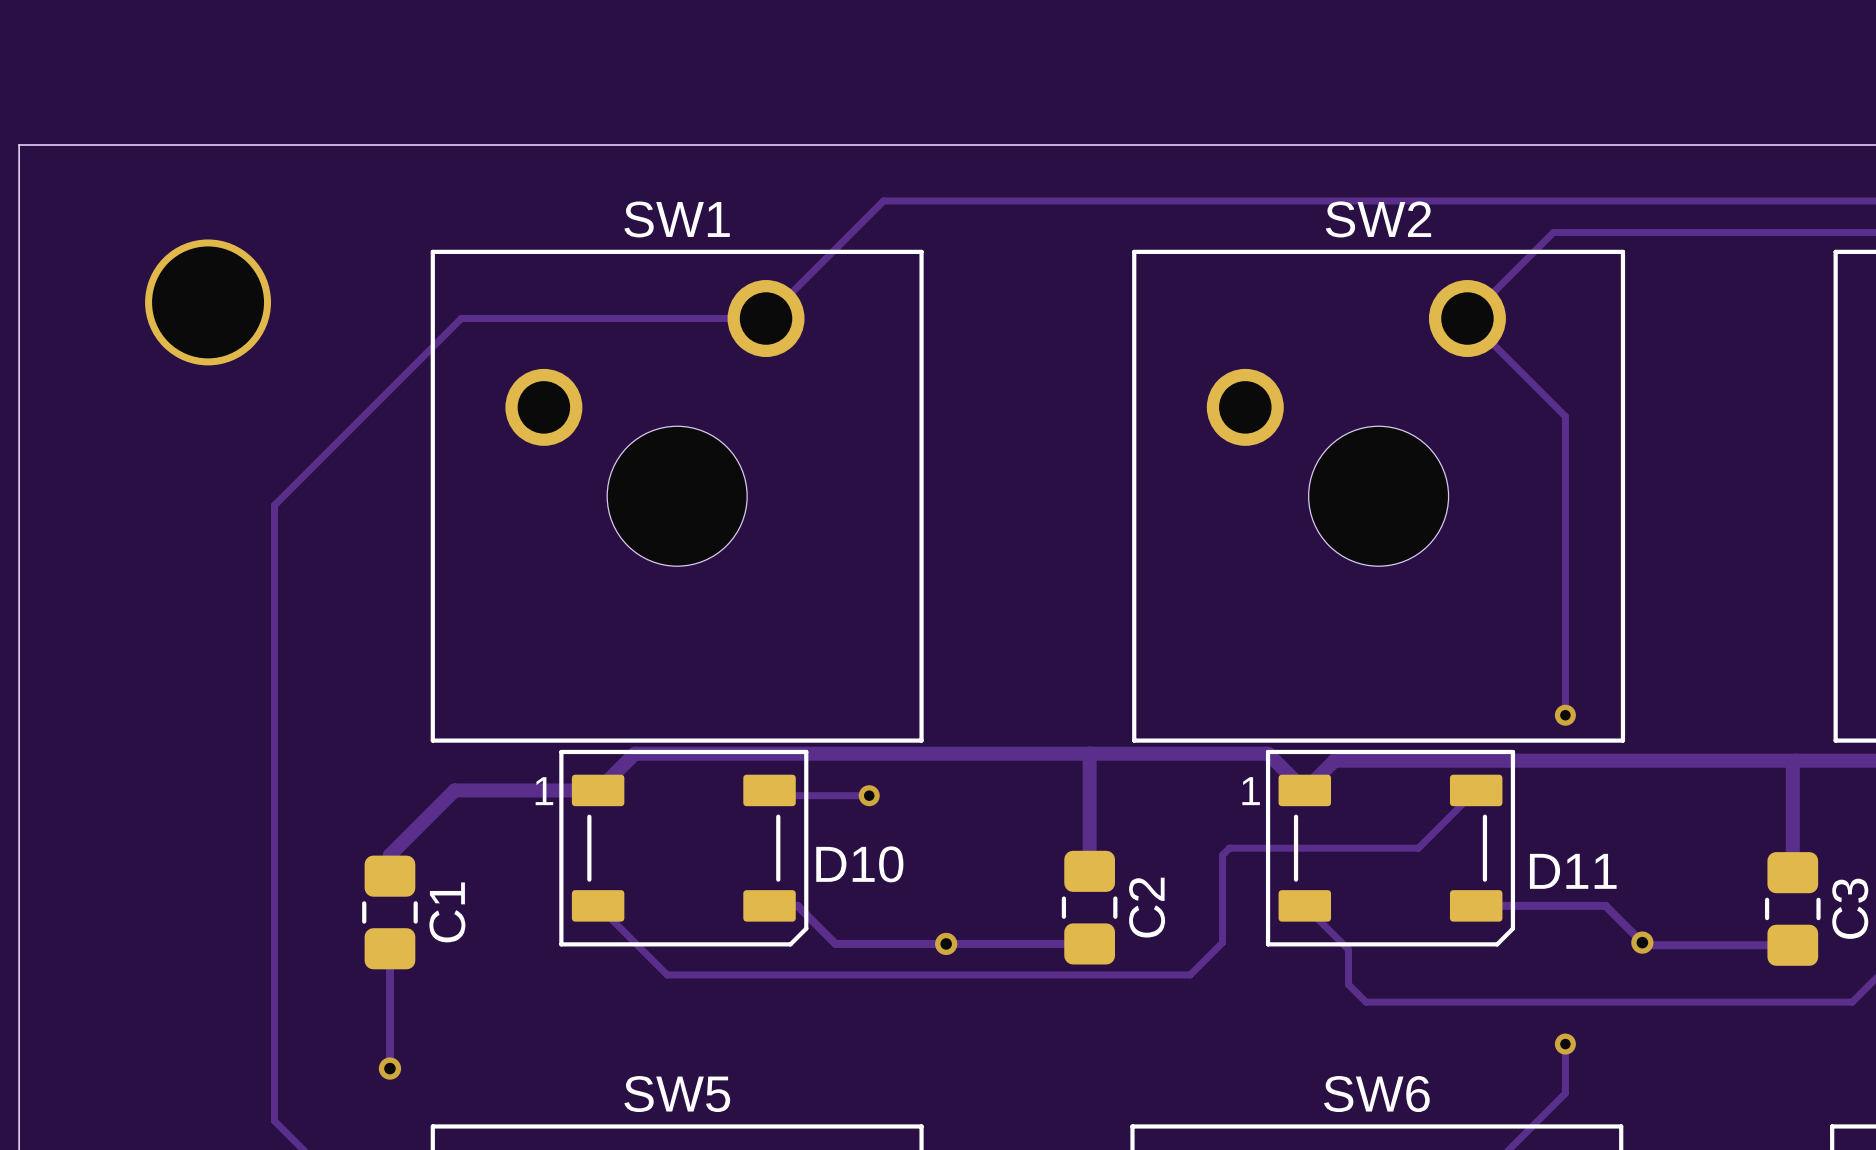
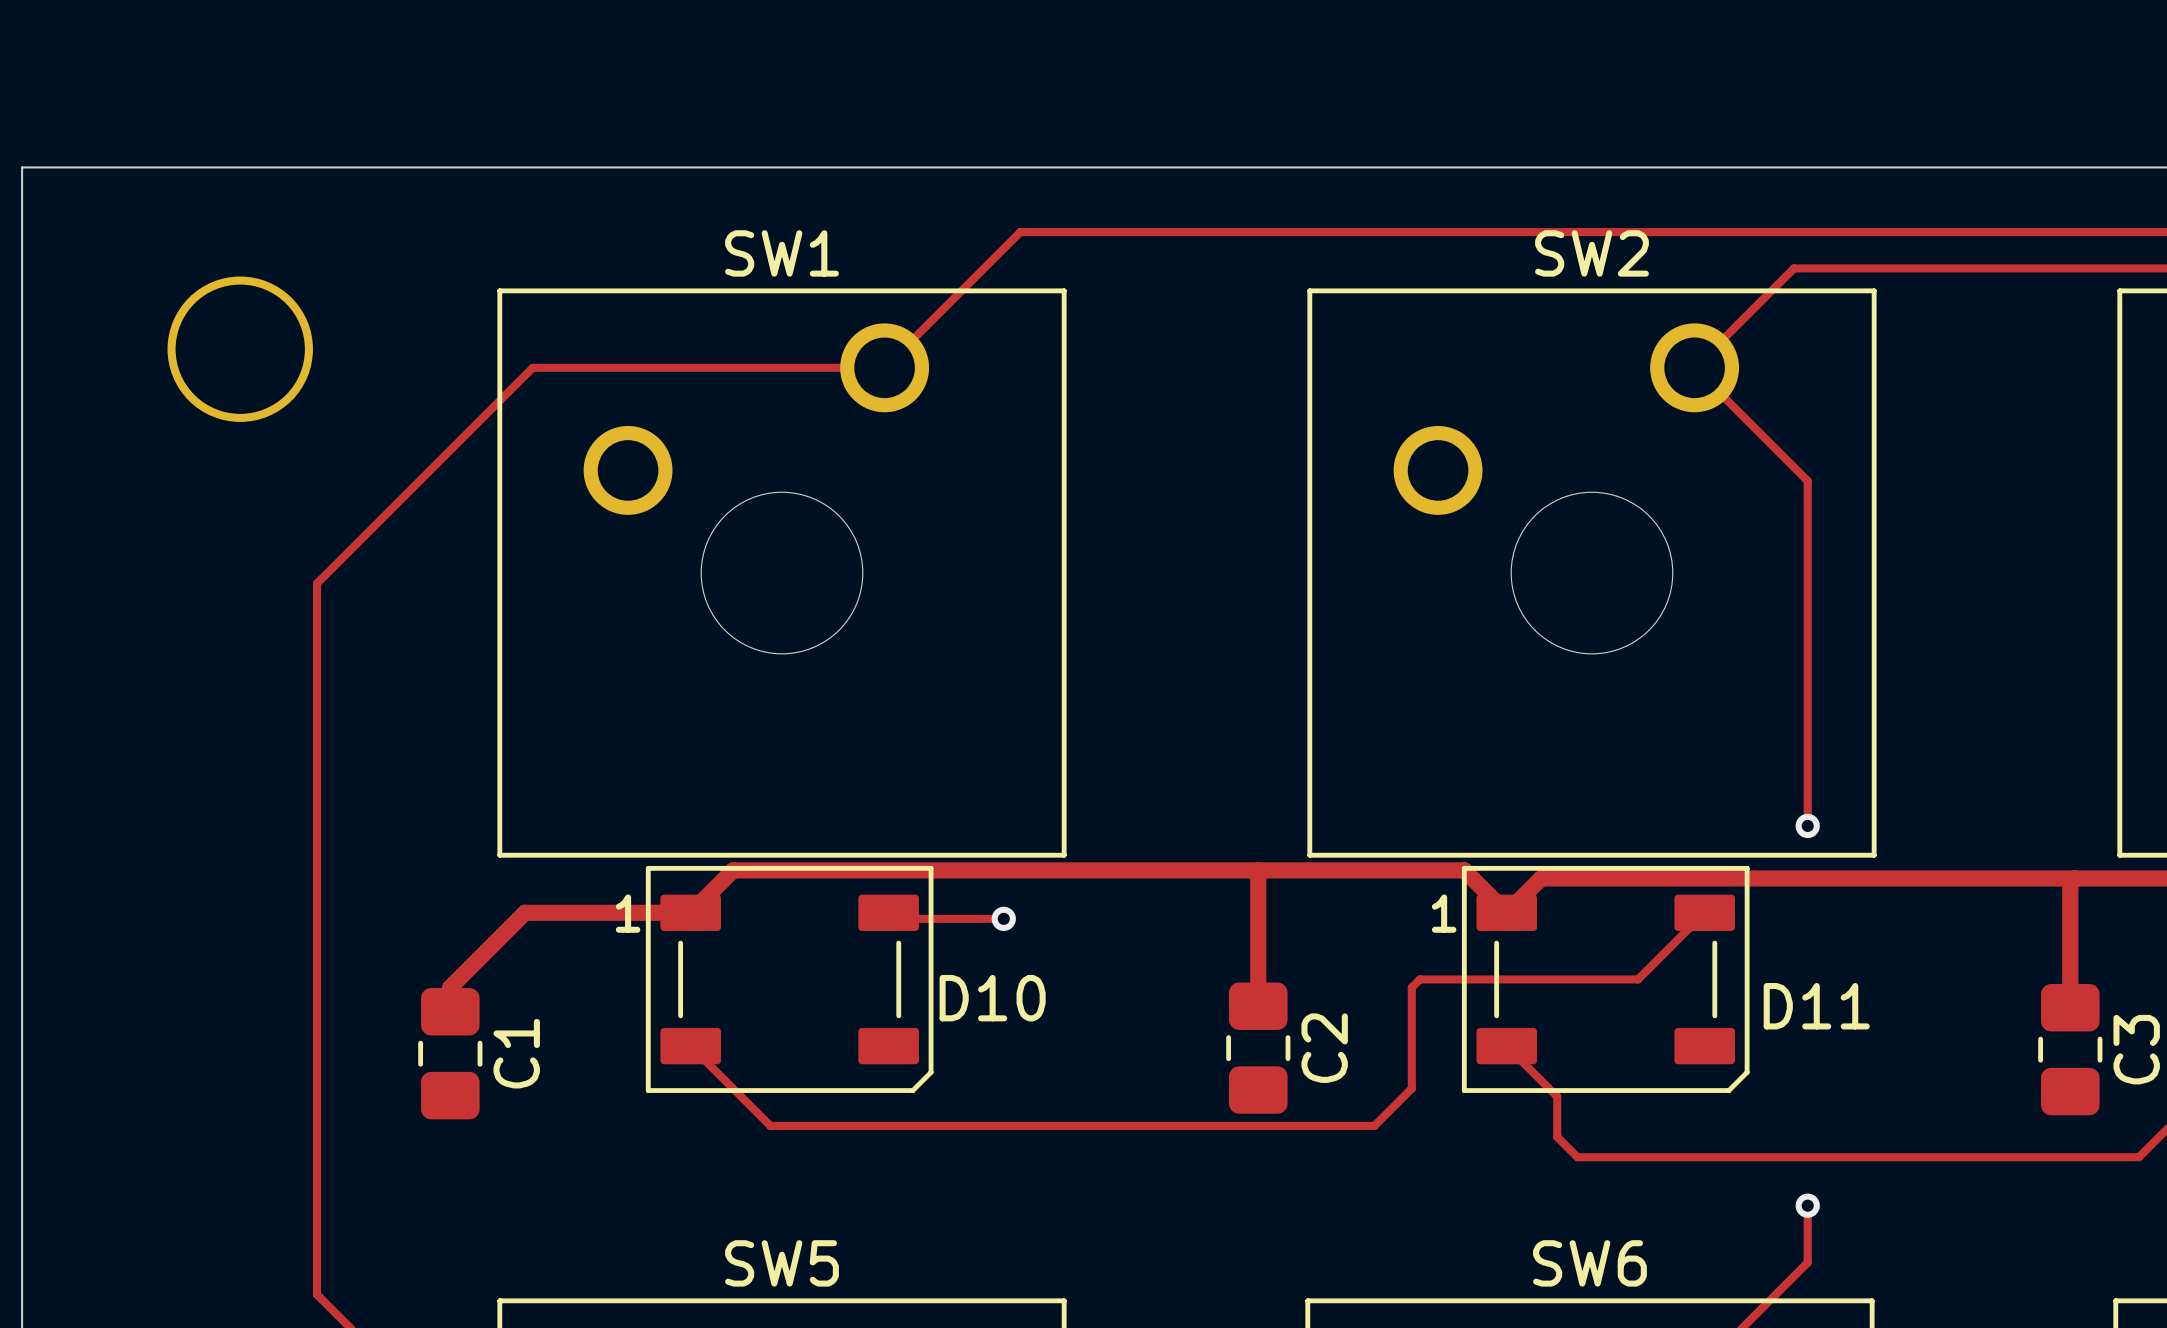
track: (769, 905) (797, 905) (835, 943) (1089, 943) -> none
track: (1476, 905) (1605, 905) (1644, 945) (1792, 945) -> none
via: (1642, 942) -> none
via: (946, 943) -> none
track: (389, 948) (389, 1068) -> none
via: (389, 1068) -> none

